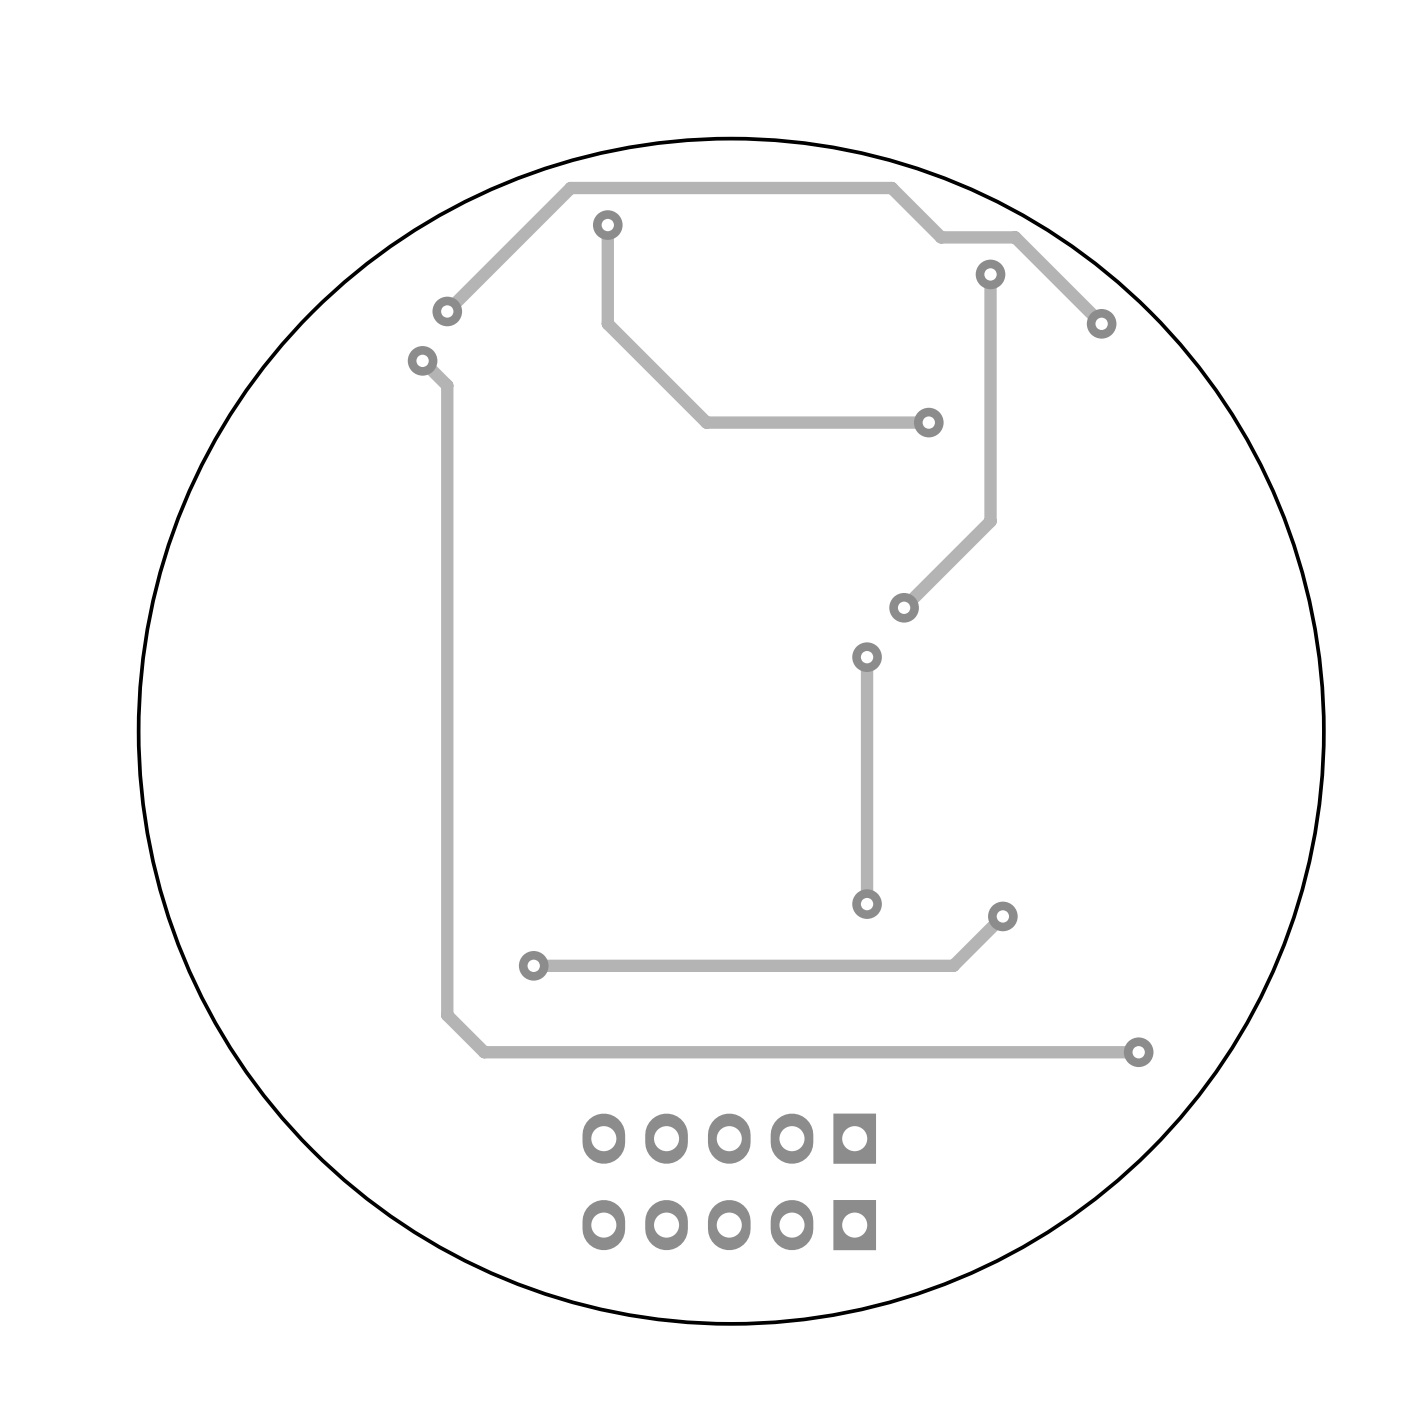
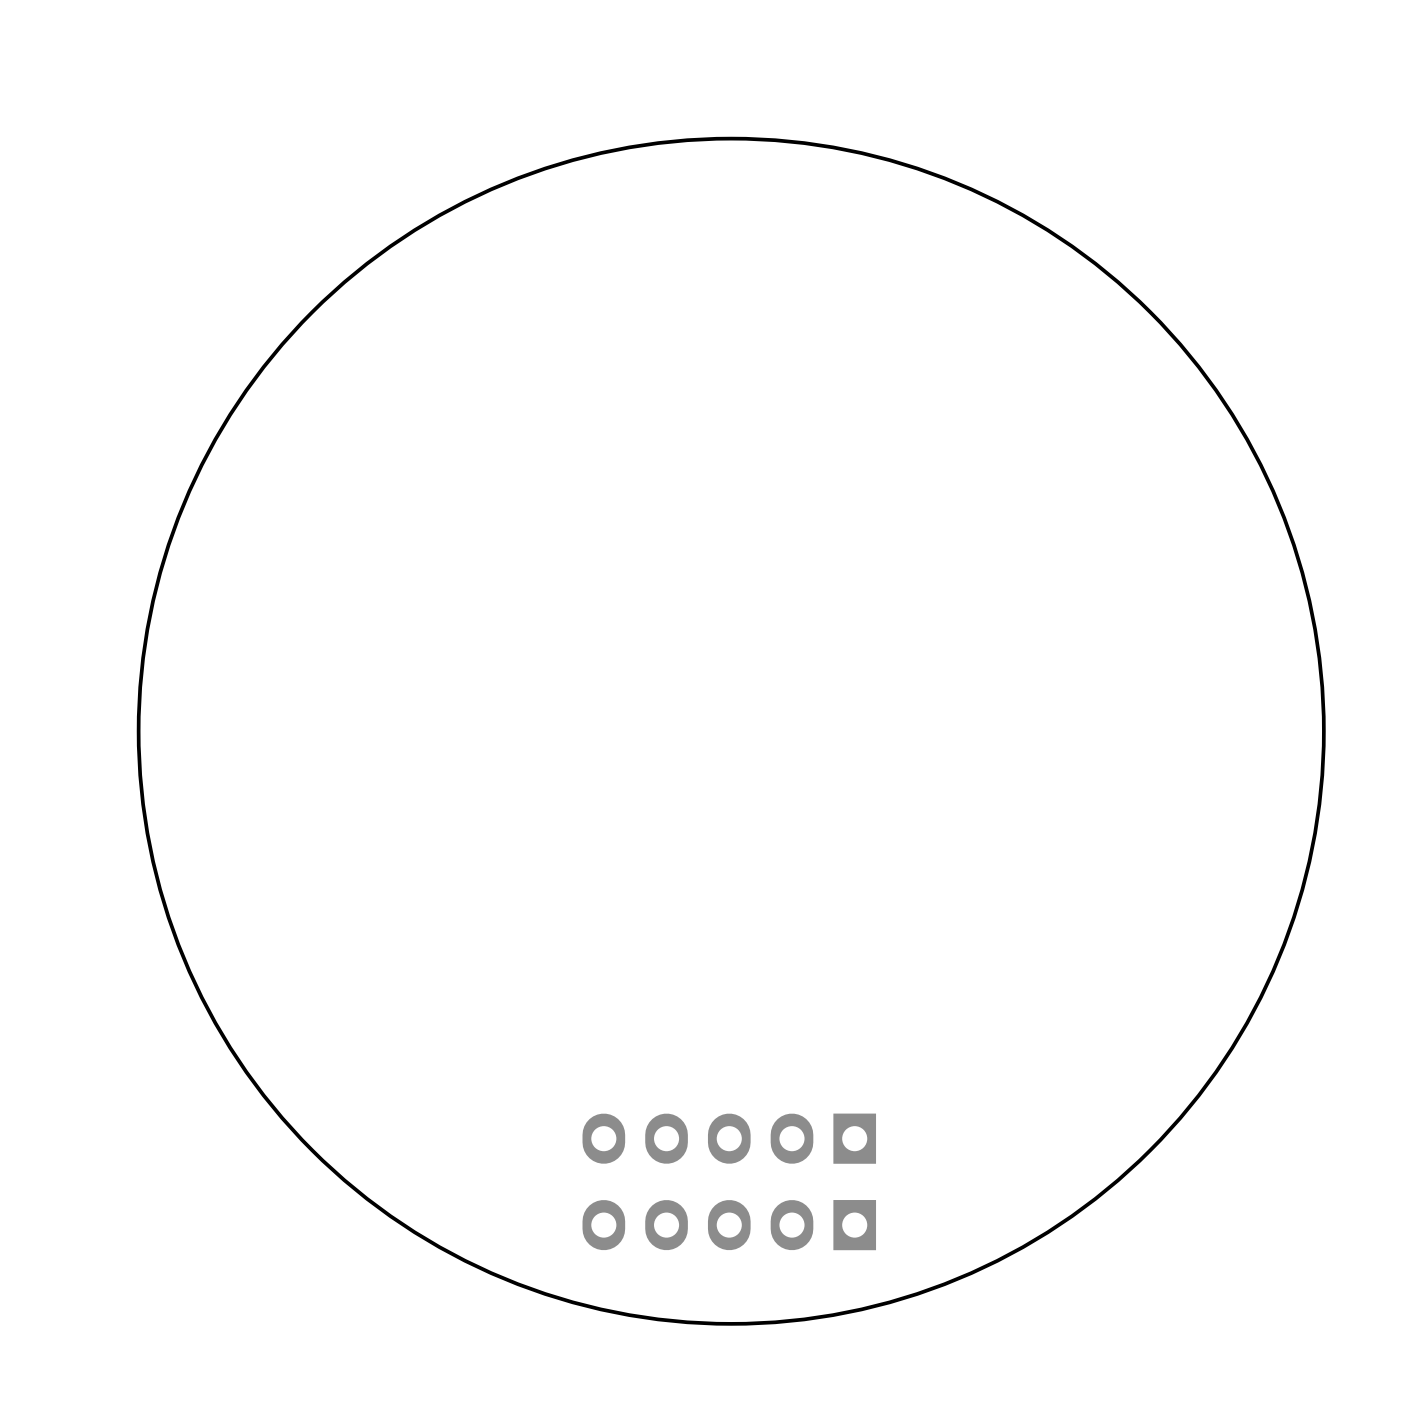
track: (607, 225) (607, 323) (706, 422) (928, 422) -> none
via: (607, 225) -> none
track: (990, 274) (990, 521) (904, 607) -> none
via: (990, 274) -> none
track: (447, 311) (570, 188) (891, 188) (941, 237) (1015, 237) (1101, 323) -> none
via: (447, 311) -> none
via: (1101, 323) -> none
track: (422, 360) (447, 385) (447, 1015) (484, 1052) (1138, 1052) -> none
via: (422, 360) -> none
via: (928, 422) -> none
via: (904, 607) -> none
track: (867, 657) (867, 904) -> none
via: (867, 657) -> none
via: (867, 904) -> none
track: (1002, 916) (953, 965) (533, 965) -> none
via: (1002, 916) -> none
via: (533, 965) -> none
via: (1138, 1052) -> none

